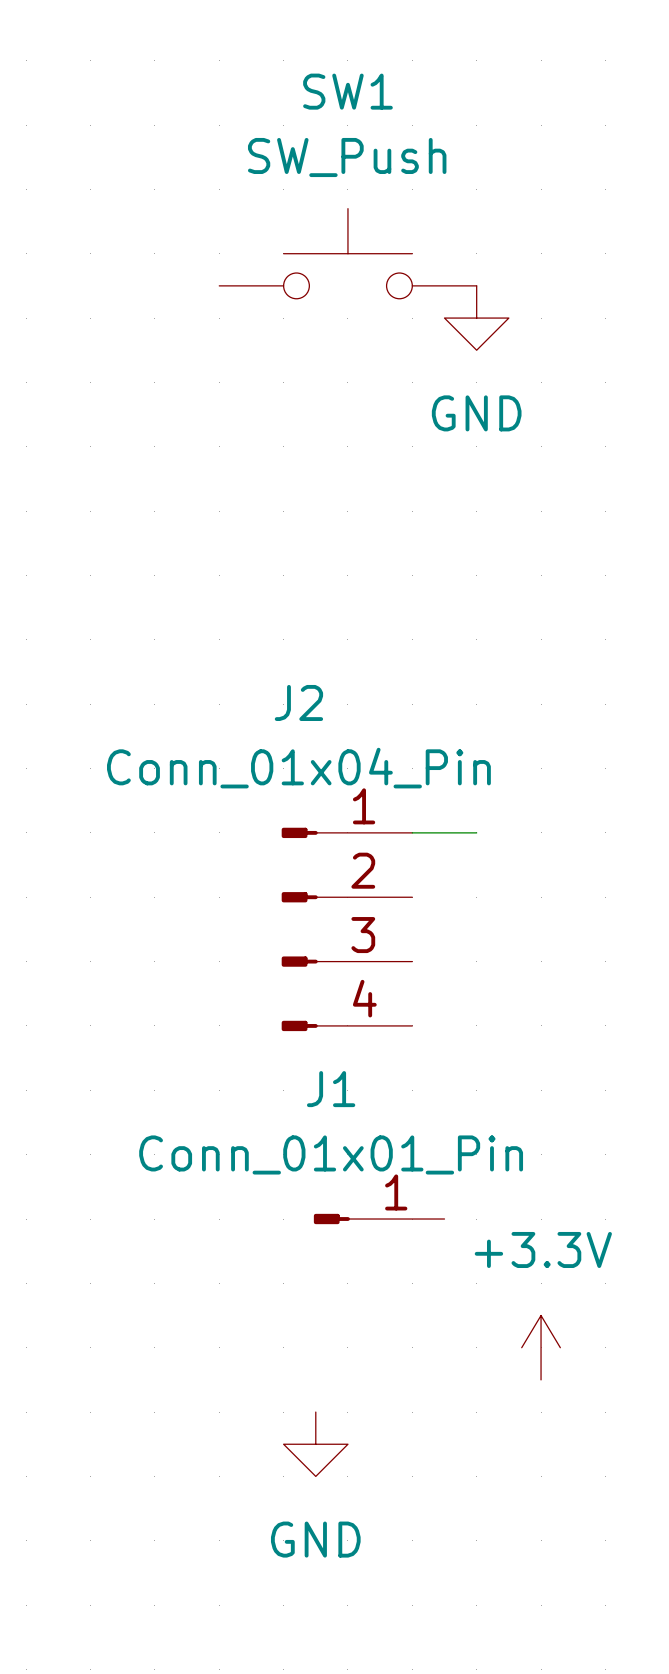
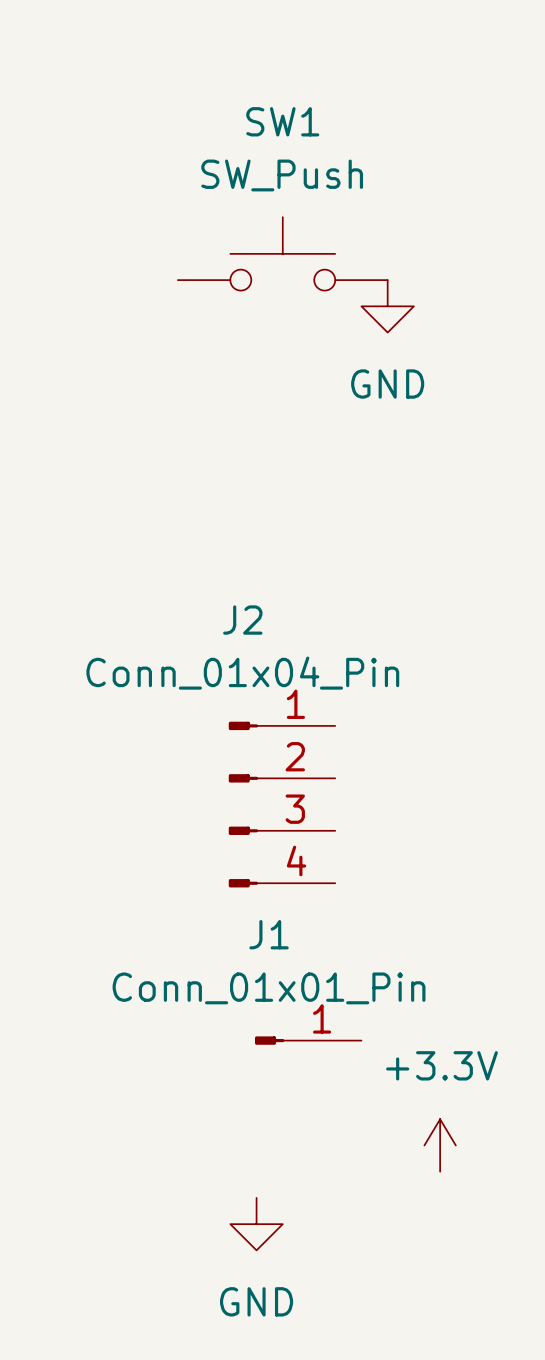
wire: (412, 832) (476, 832) -> none

